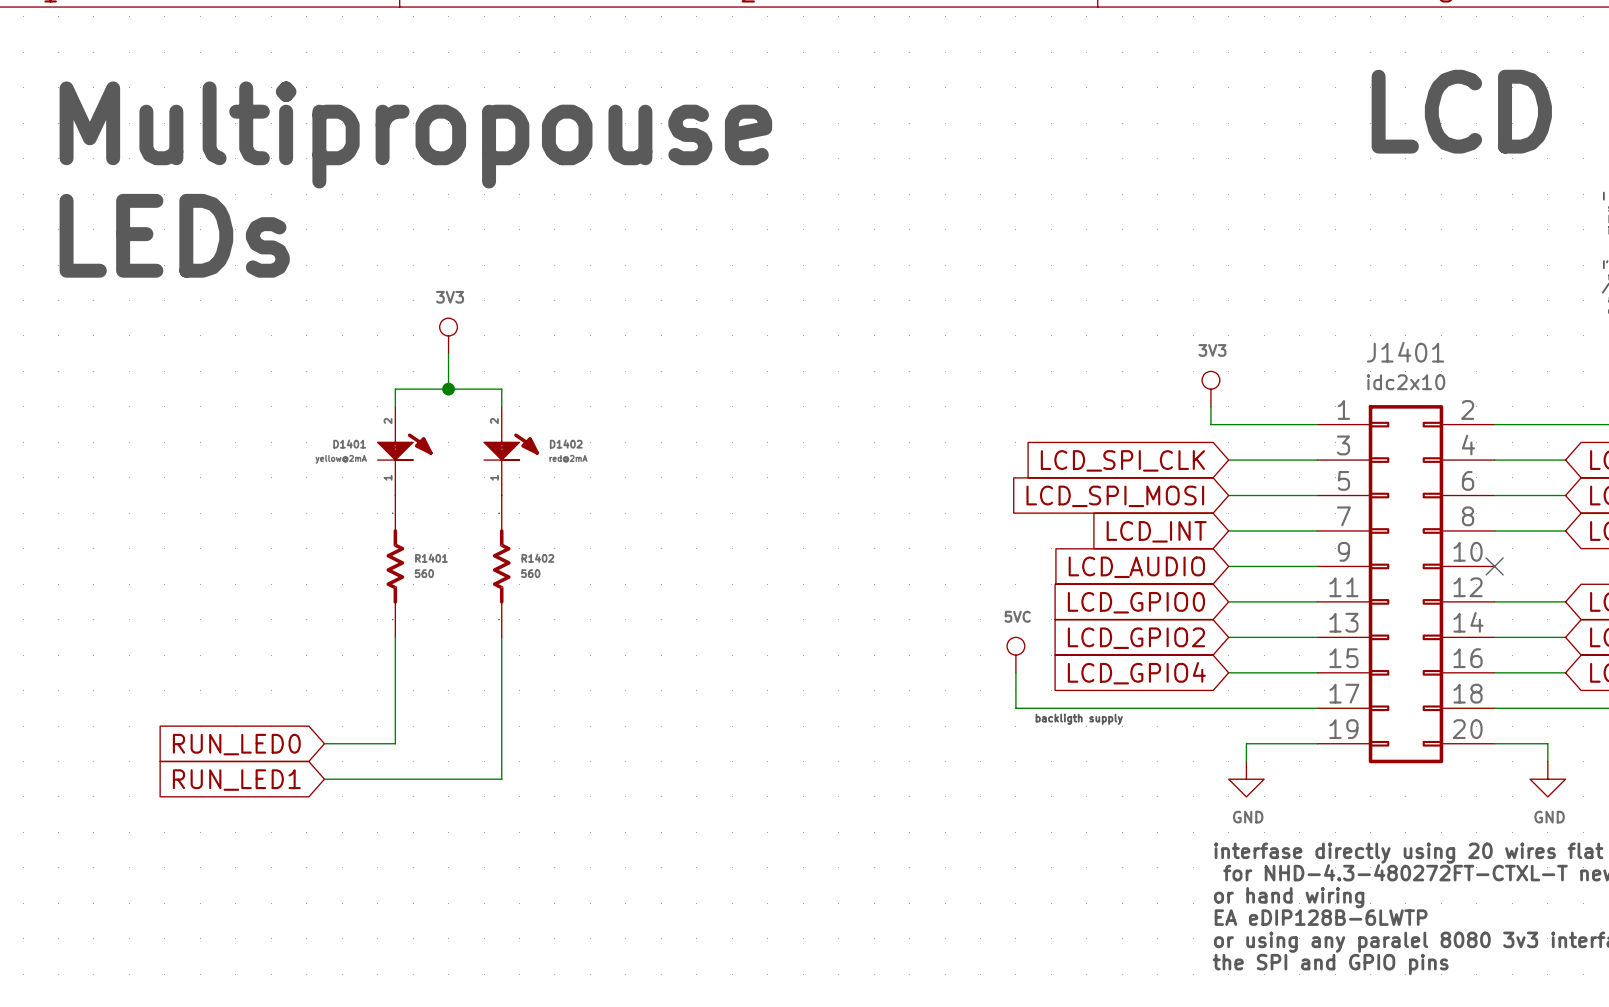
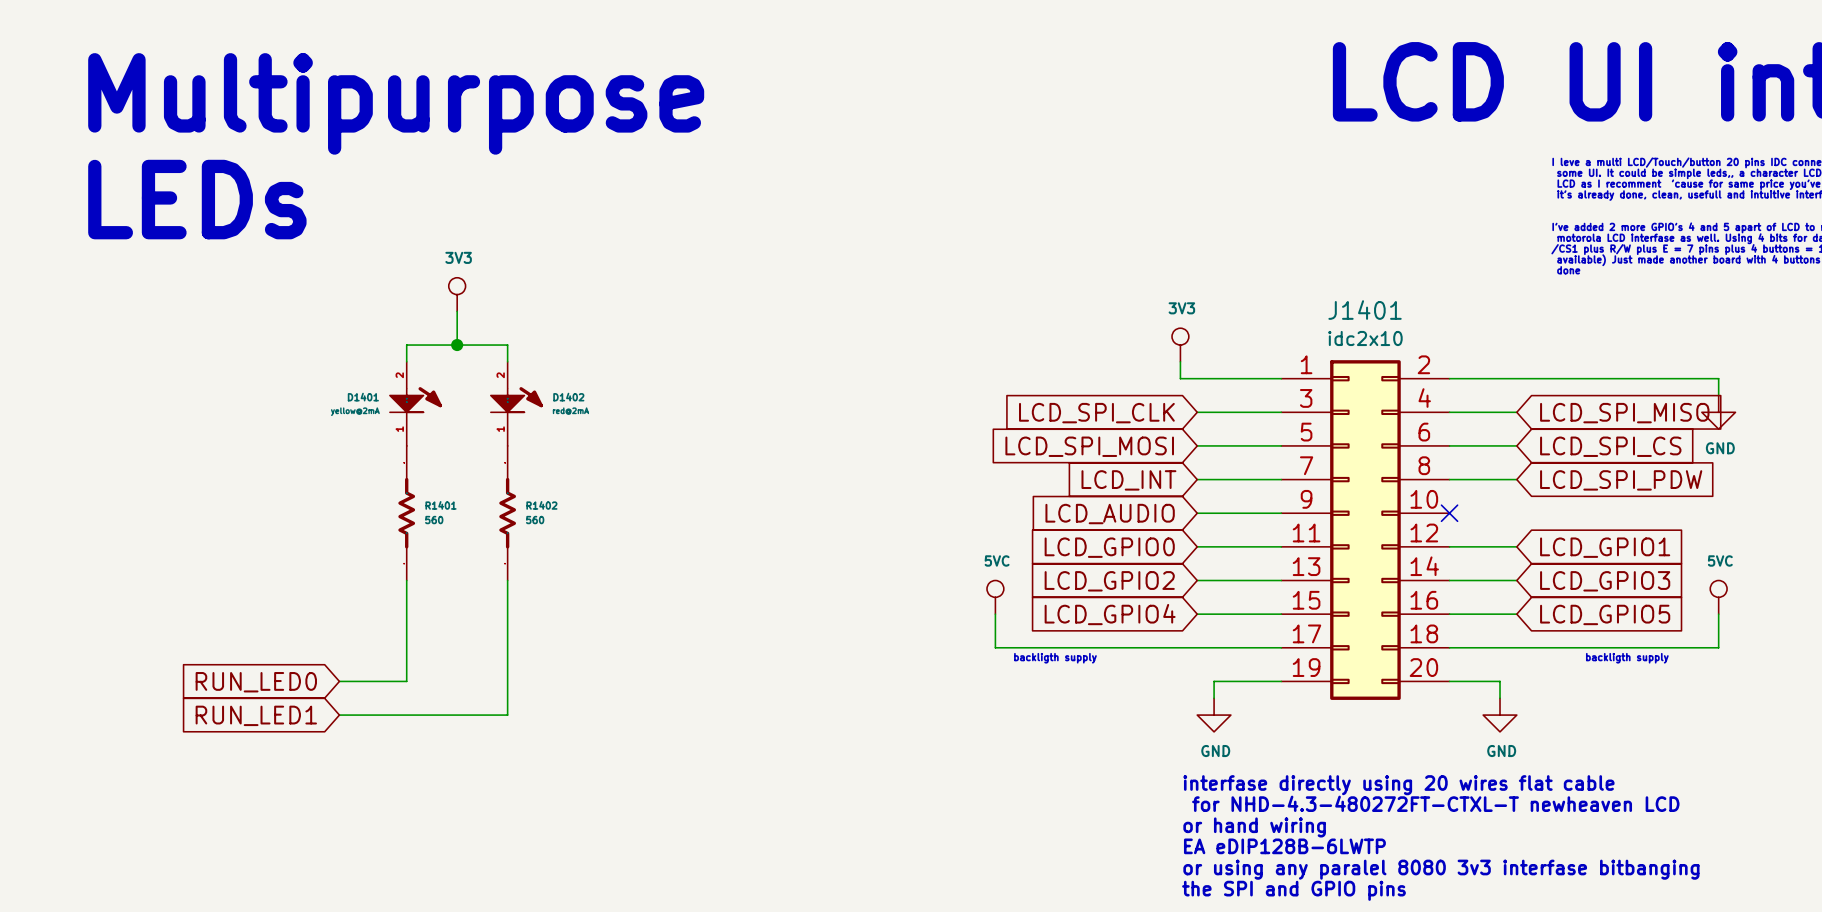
text: Multipropouse (415, 134) -> Multipurpose (396, 103)

